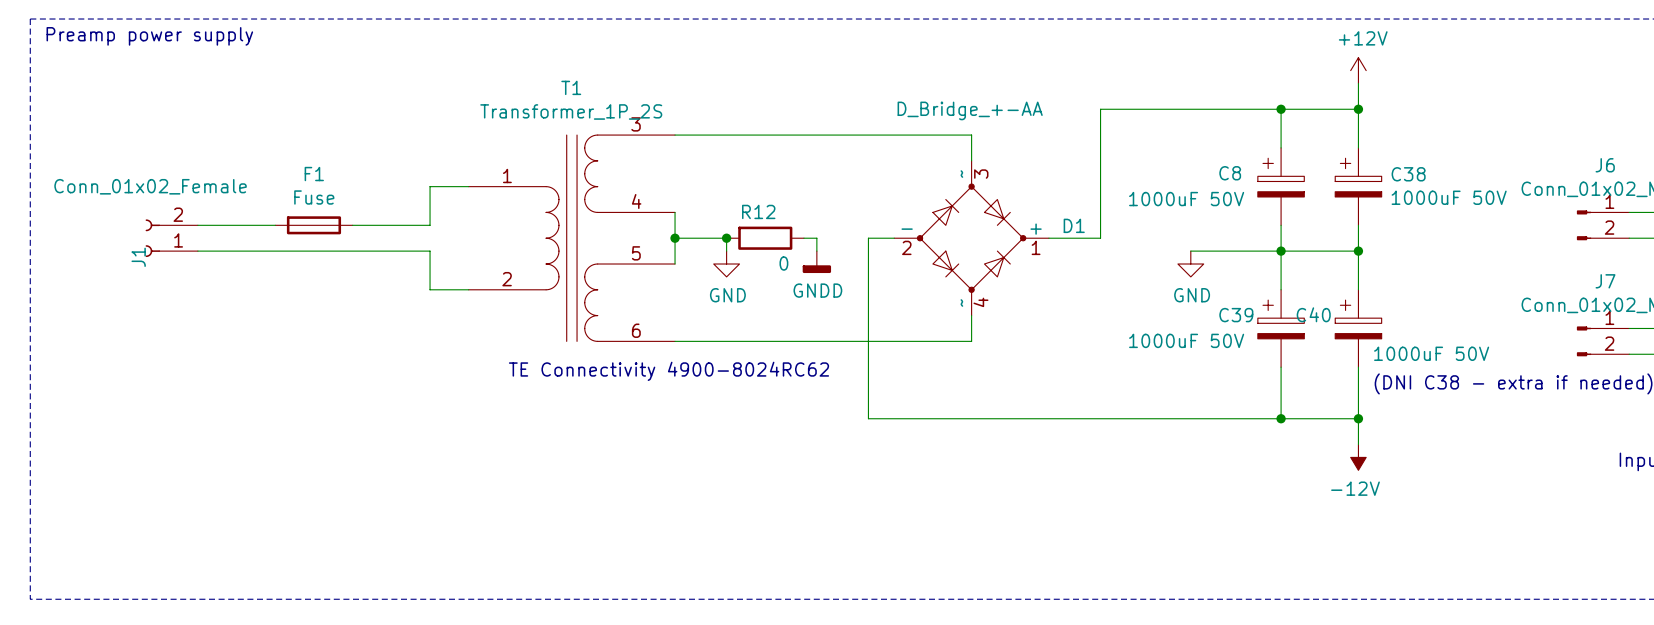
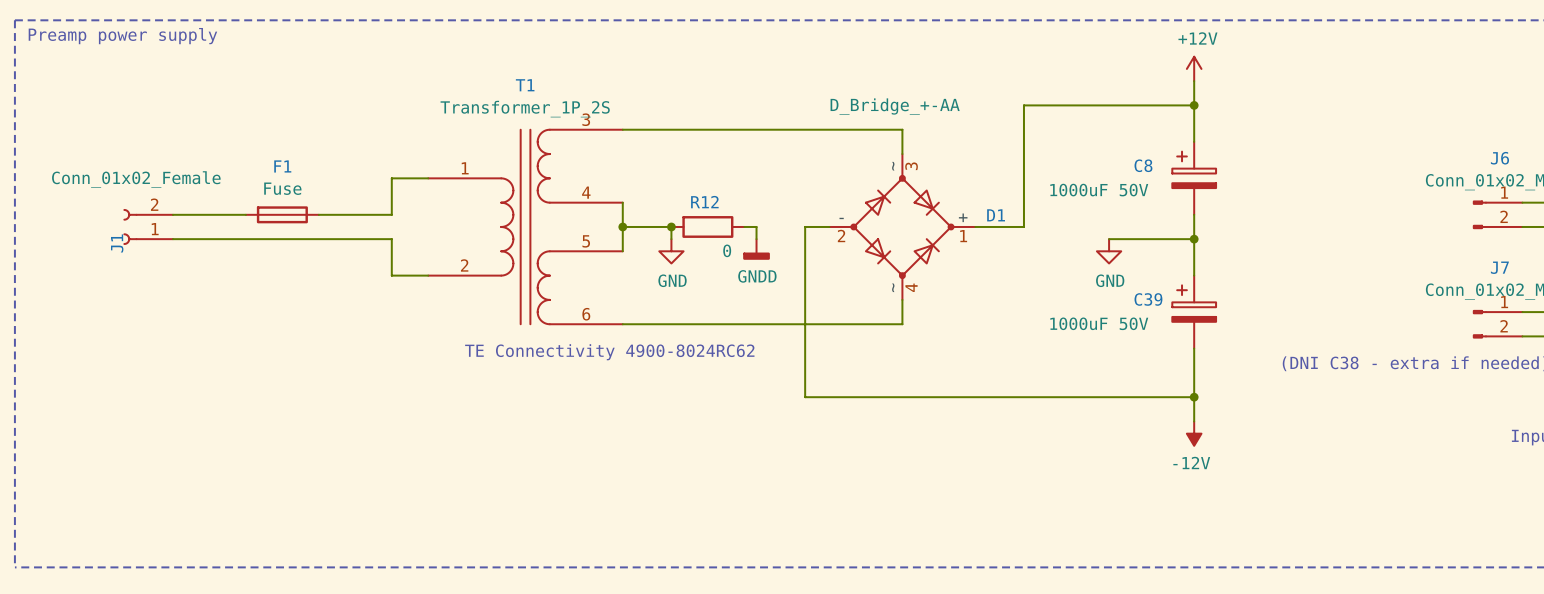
power symbol position: +12V (1358, 70) -> +12V (1194, 68)
wire: (1358, 83) (1358, 147) -> none
wire: (1281, 109) (1358, 109) -> (1194, 105) (1194, 81)
junction: (1358, 109) -> none
C38: 1000uF 50V (1358, 186) -> none
wire: (1358, 225) (1358, 289) -> none
wire: (1281, 251) (1358, 251) -> none
junction: (1358, 251) -> none
C40: 1000uF 50V (1358, 328) -> none
wire: (1358, 367) (1358, 444) -> none
wire: (1281, 418) (1358, 418) -> (1194, 397) (1194, 421)
junction: (1358, 418) -> none
power symbol position: -12V (1358, 457) -> -12V (1194, 433)

